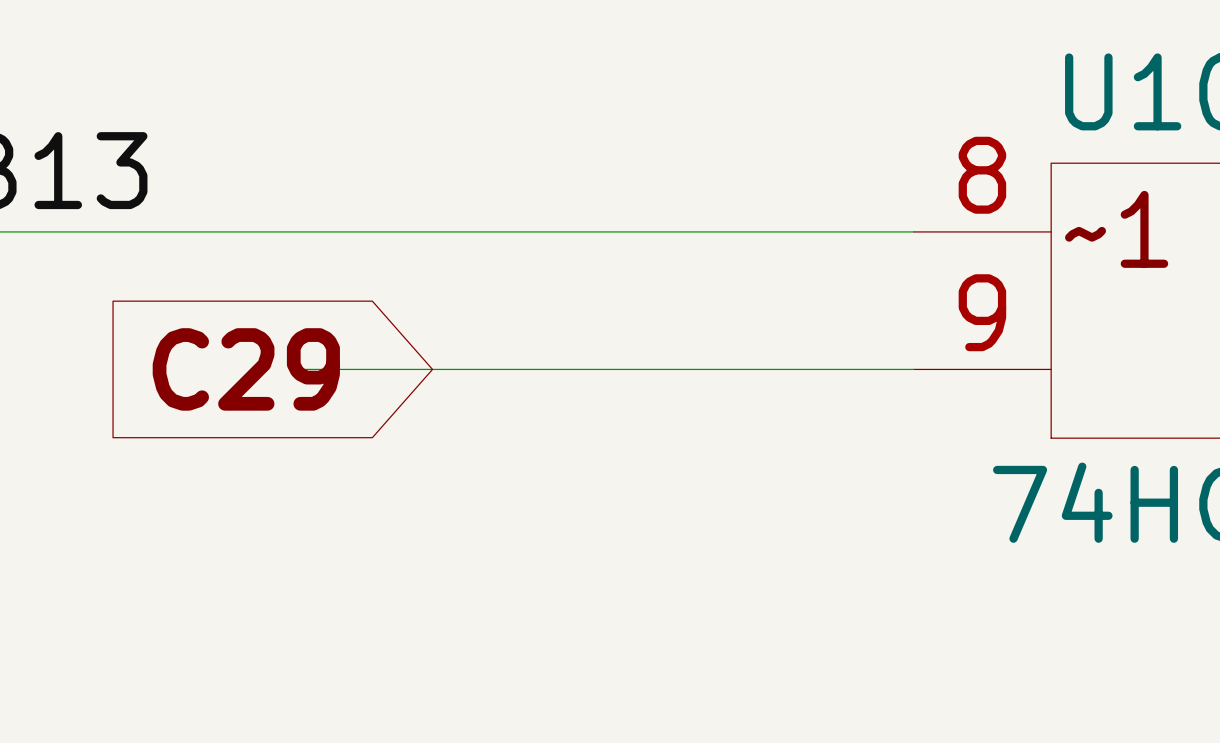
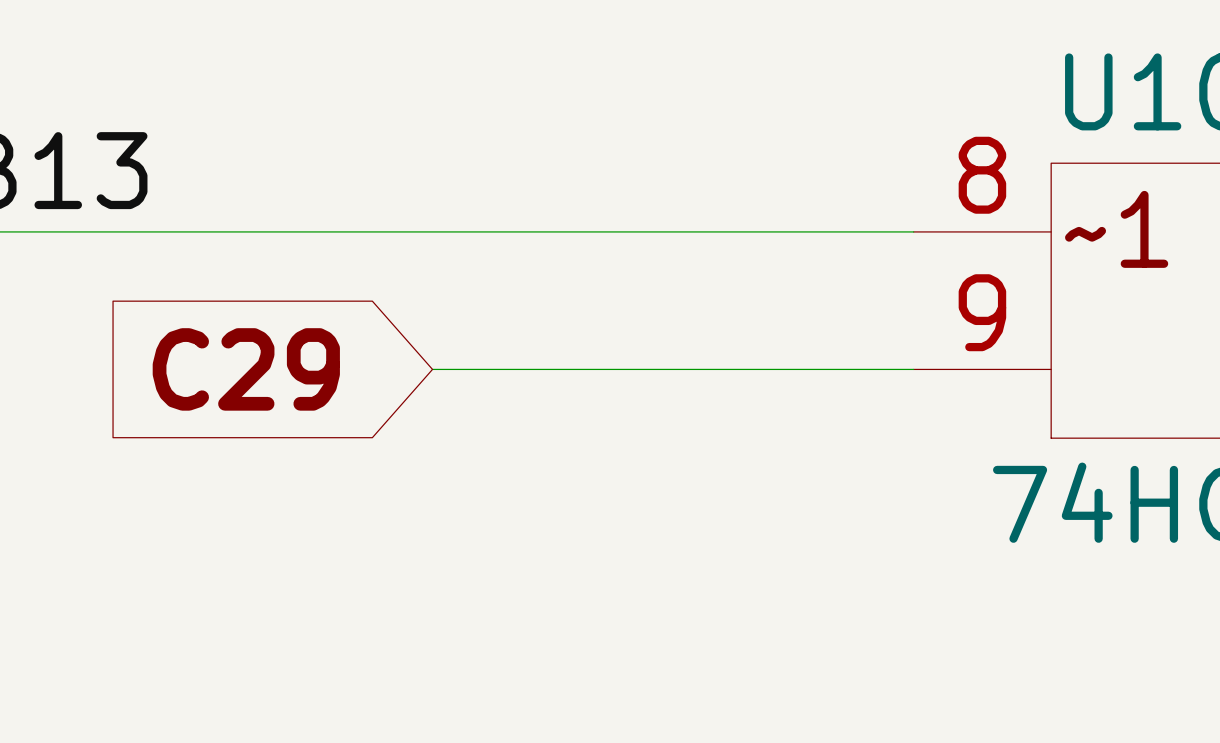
wire: (295, 369) (432, 369) -> none

